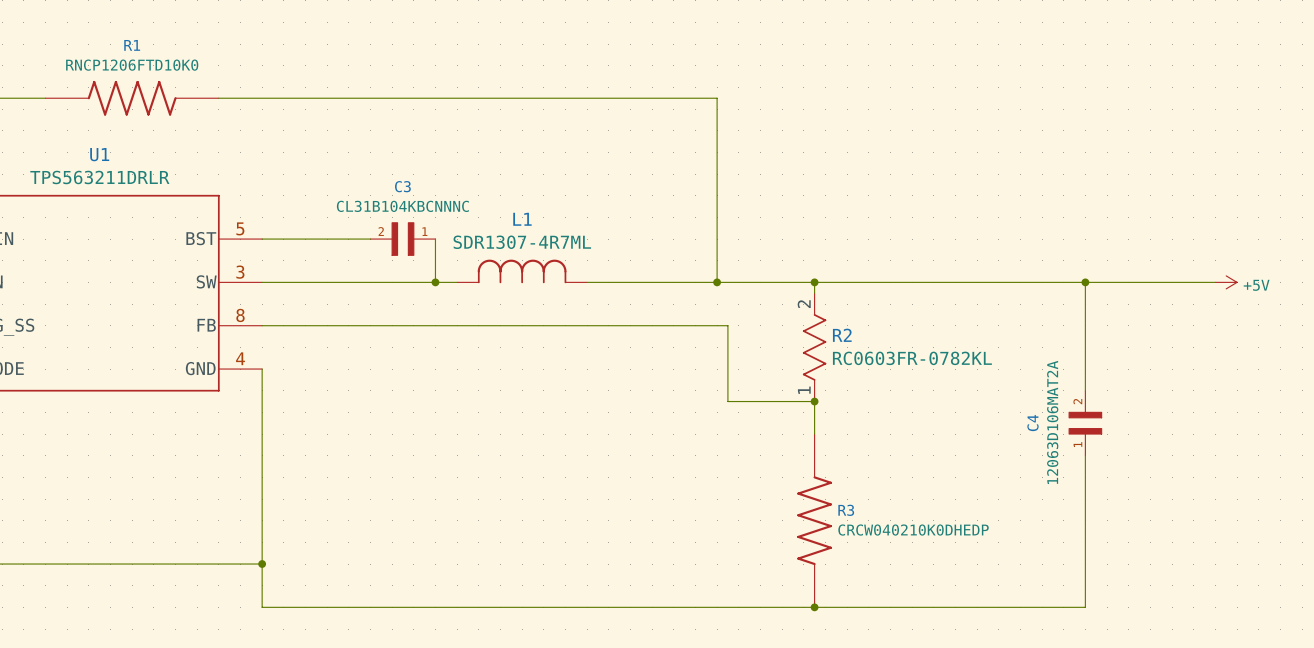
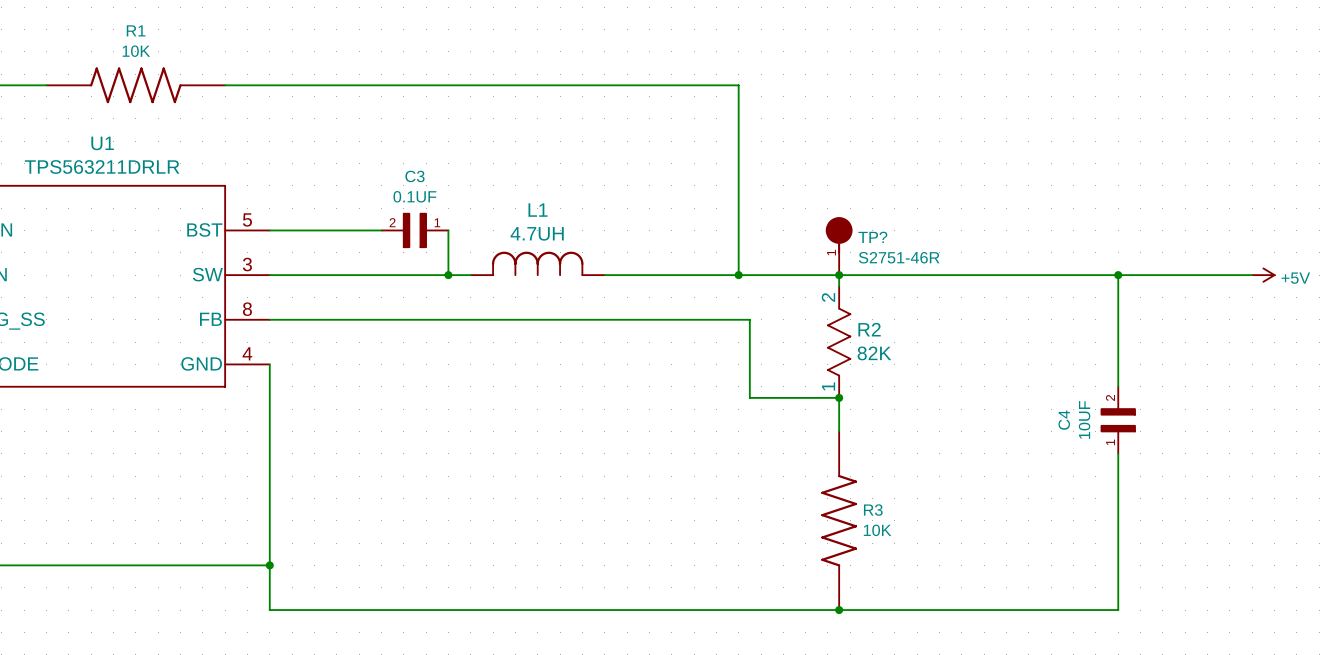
R1 value: RNCP1206FTD10K0 (132, 65) -> 10K (136, 51)
C3 value: CL31B104KBCNNNC (402, 206) -> 0.1UF (414, 196)
L1 value: SDR1307-4R7ML (522, 242) -> 4.7UH (537, 233)
TP?: none -> S2751-46R (839, 246)
R2 value: RC0603FR-0782KL (912, 358) -> 82K (874, 353)
C4 value: 12063D106MAT2A (1052, 422) -> 10UF (1084, 419)
R3 value: CRCW040210K0DHEDP (913, 530) -> 10K (877, 530)

